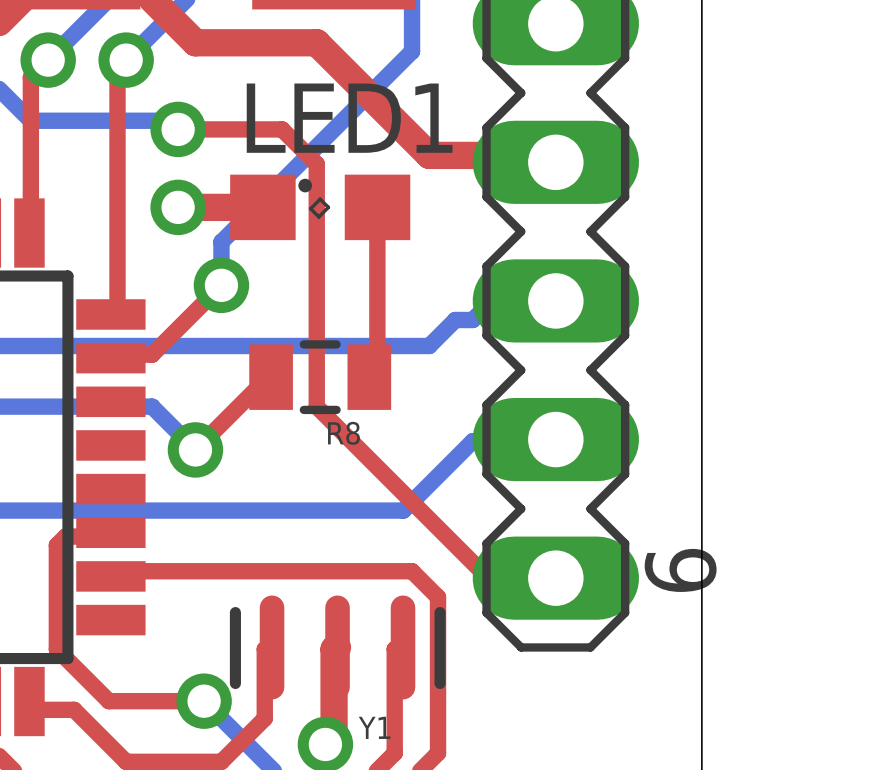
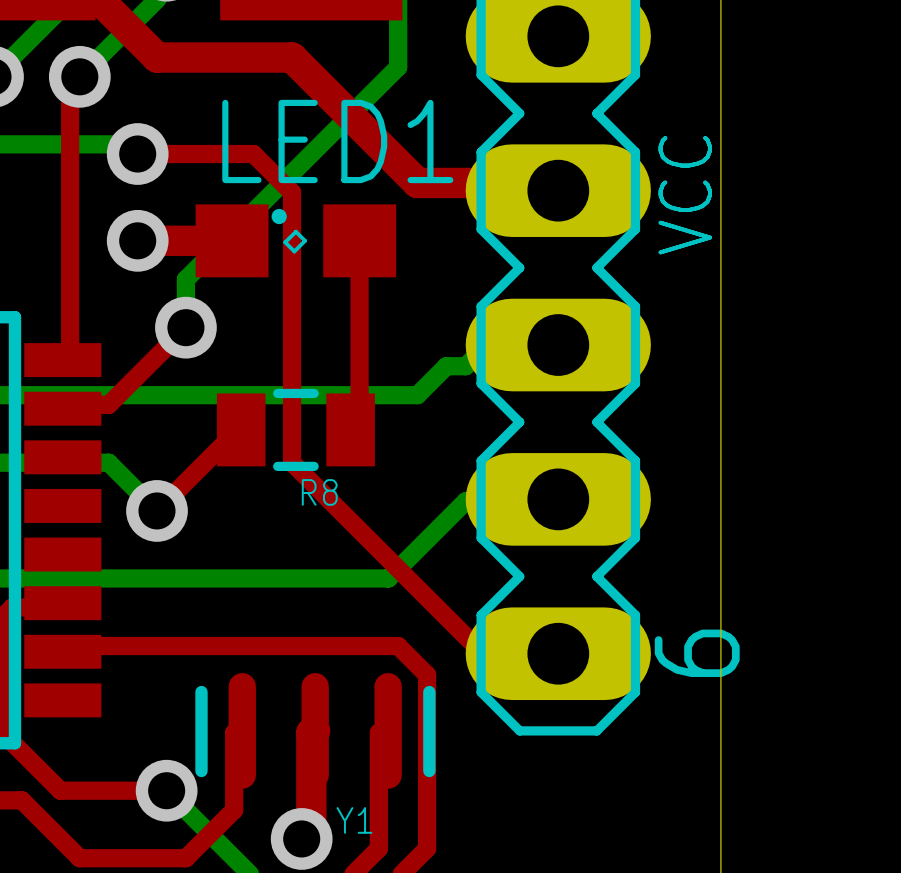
text: none -> VCC (685, 195)

